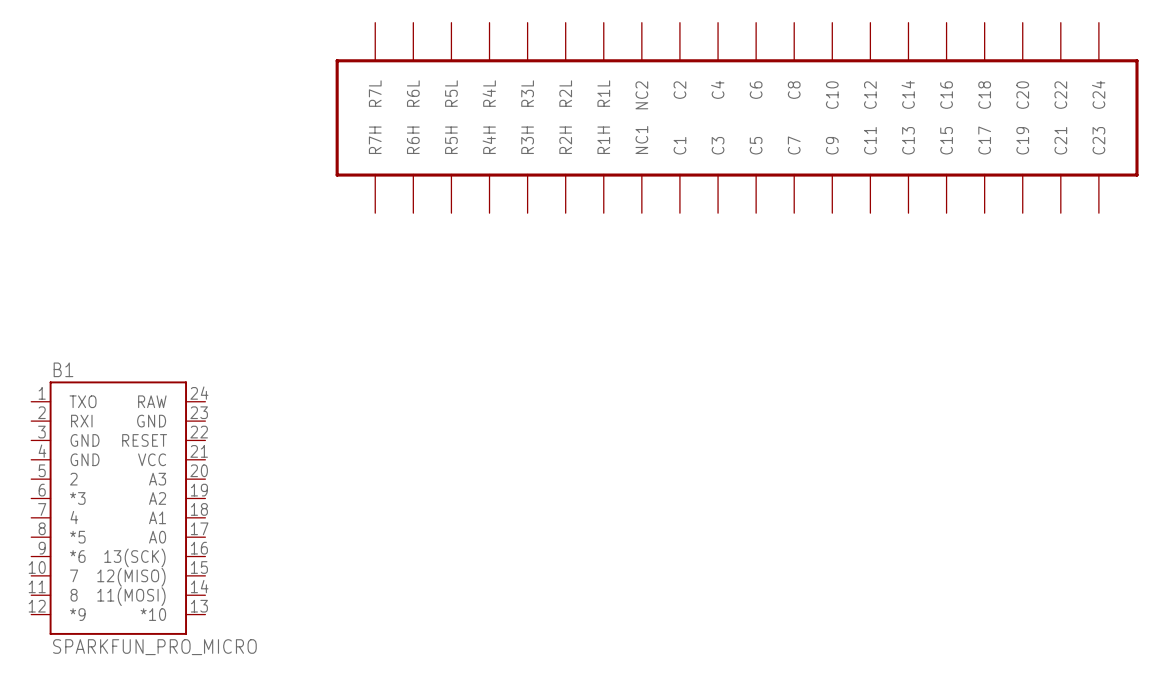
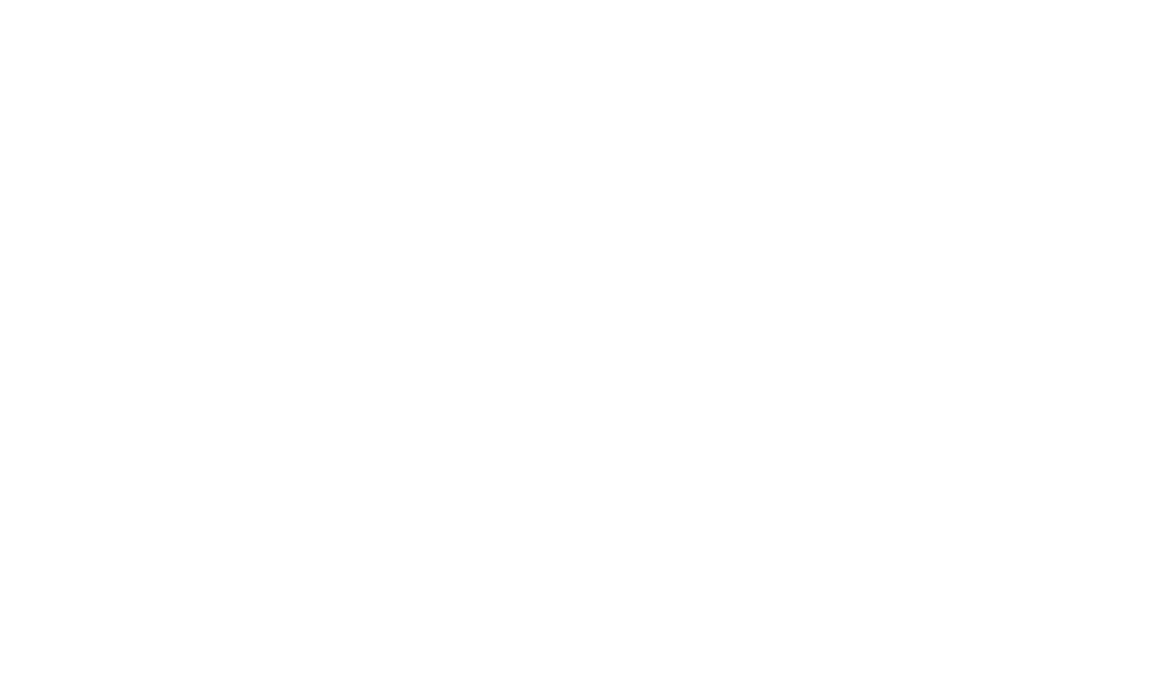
part: (737, 117) -> none
B1: SPARKFUN_PRO_MICRO (118, 508) -> none

